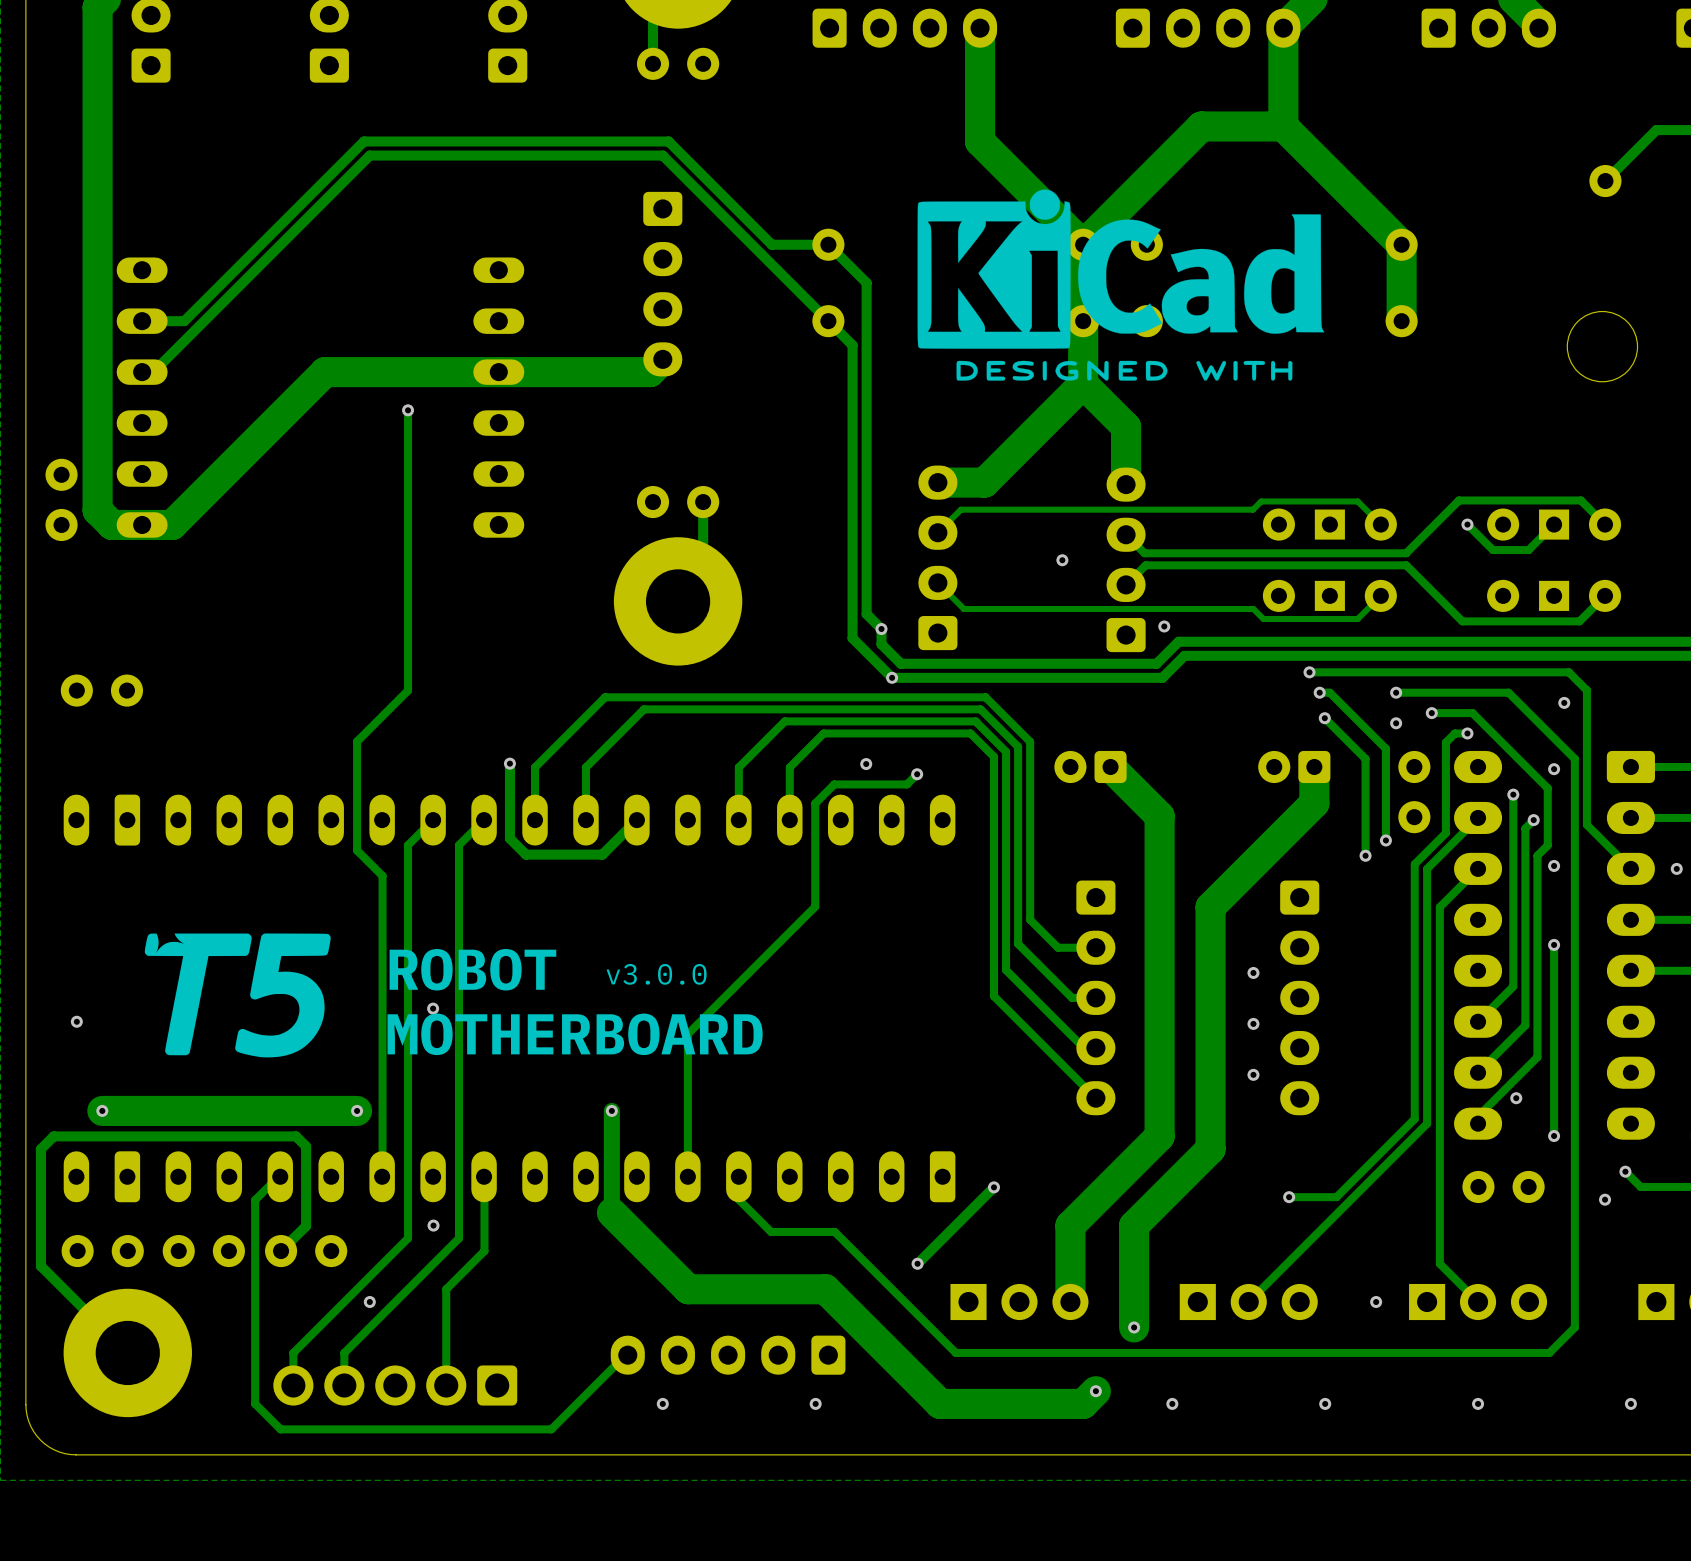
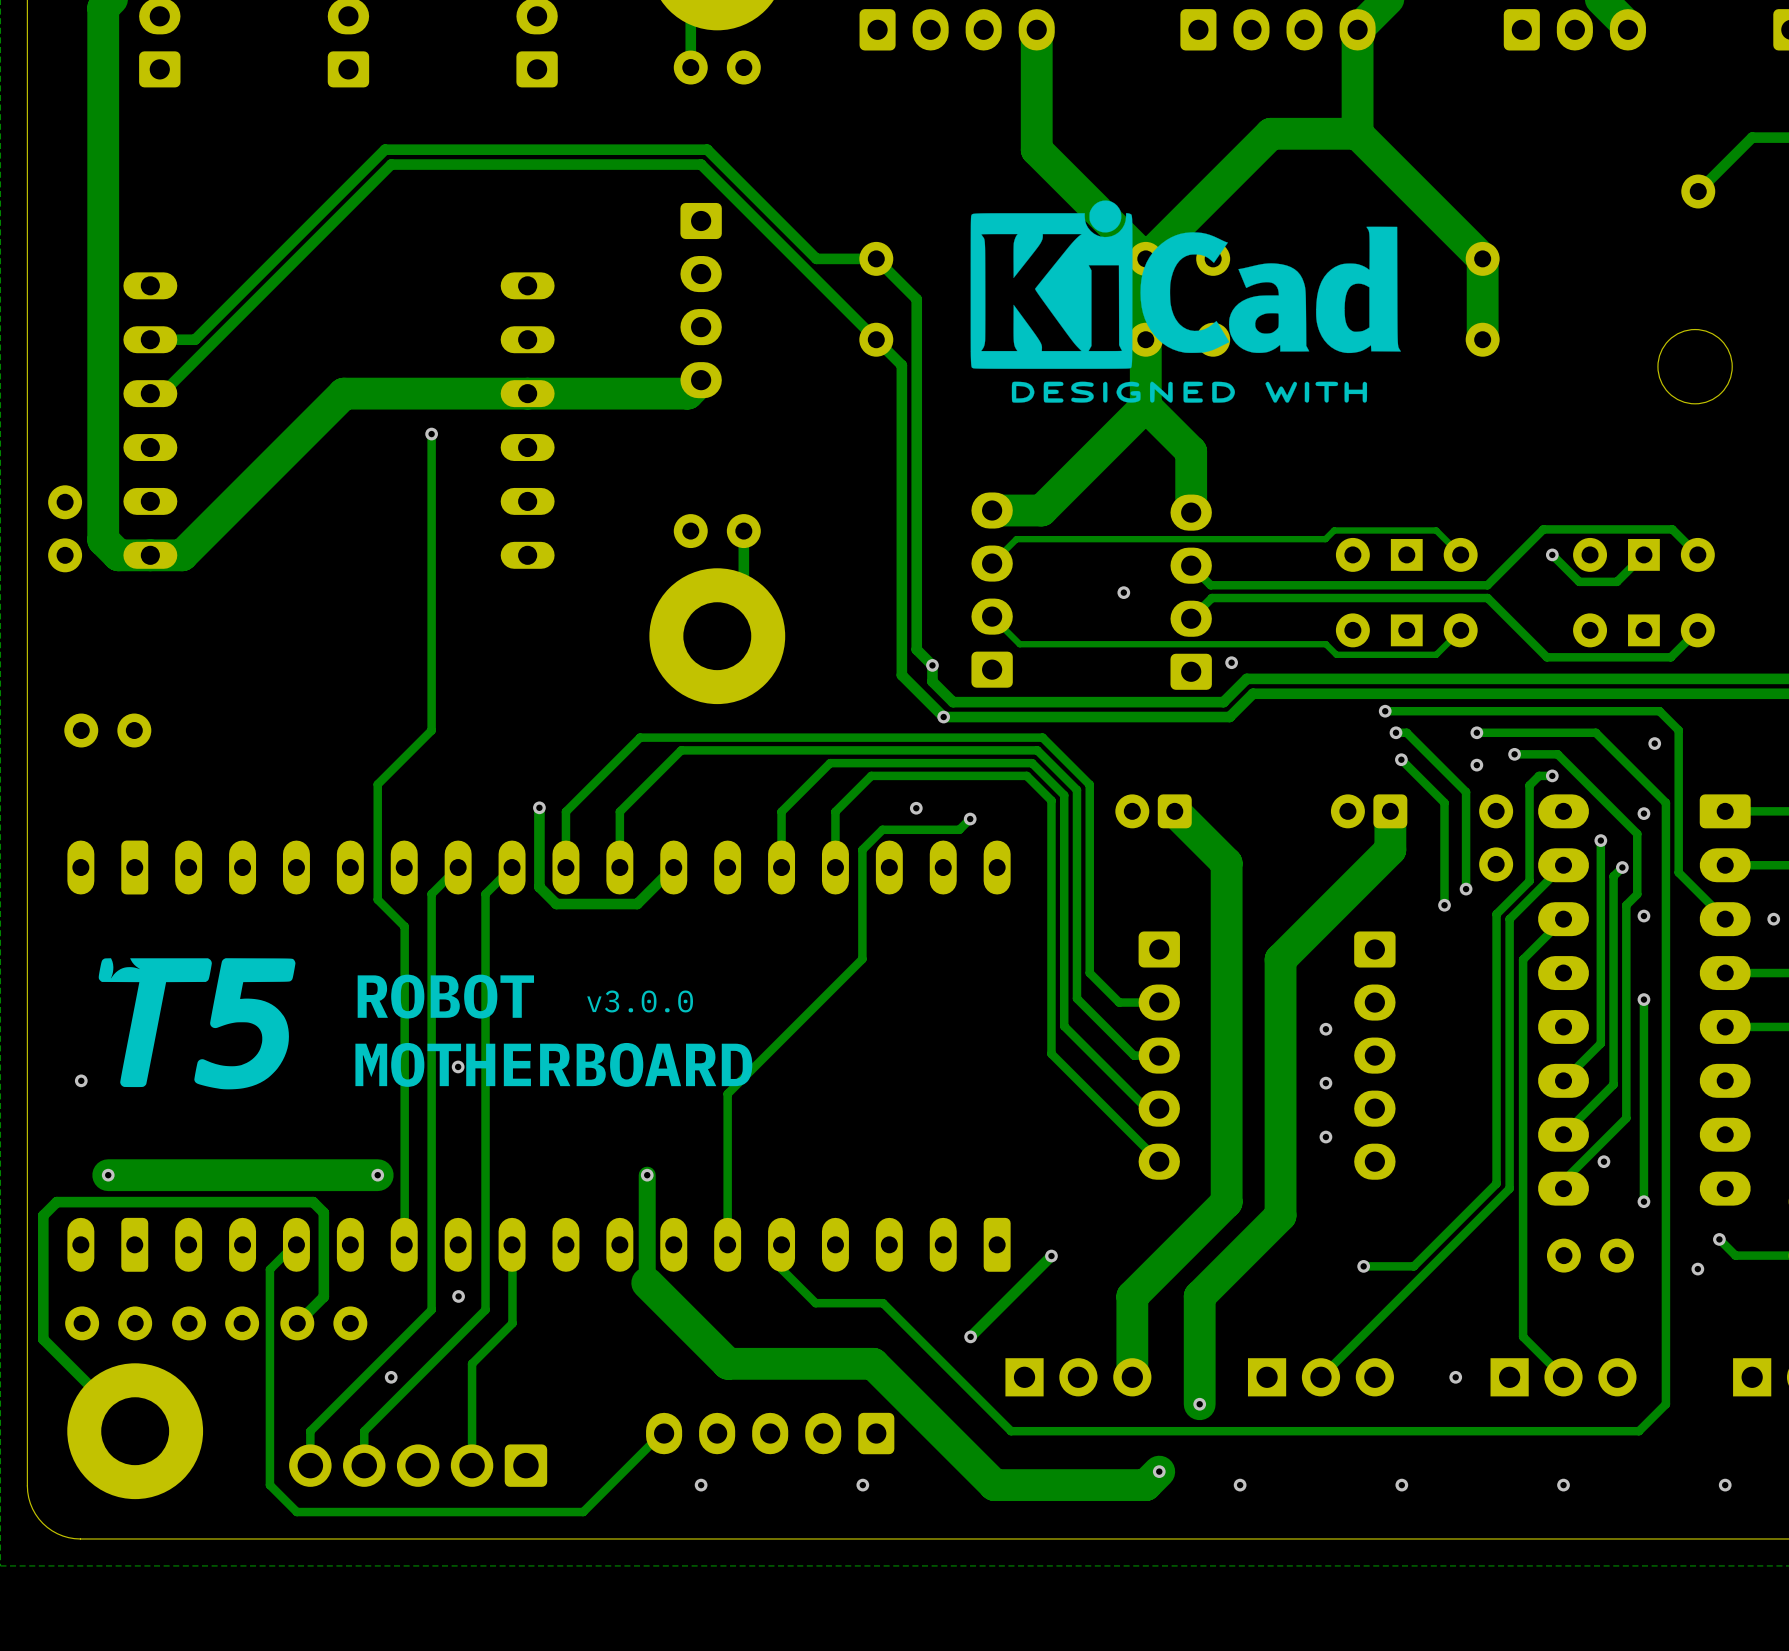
text position: ROBOT (472, 969) -> ROBOT (445, 996)
text position: v3.0.0 (656, 974) -> v3.0.0 (640, 1001)
drawing position: (237, 995) -> (197, 1023)
text position: MOTHERBOARD (575, 1034) -> MOTHERBOARD (553, 1064)

